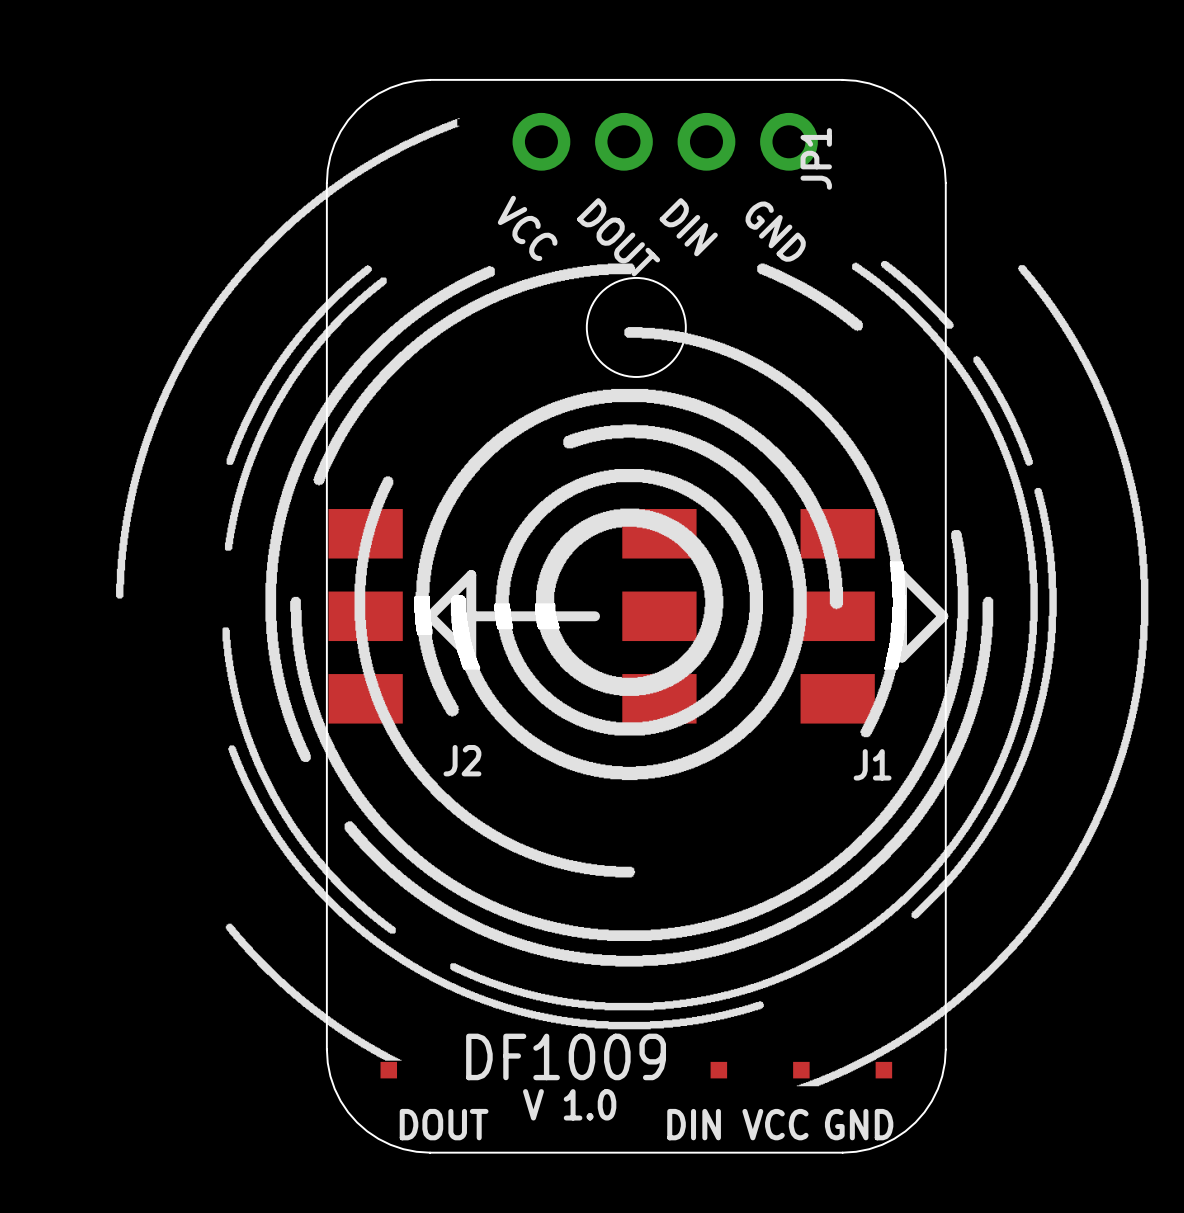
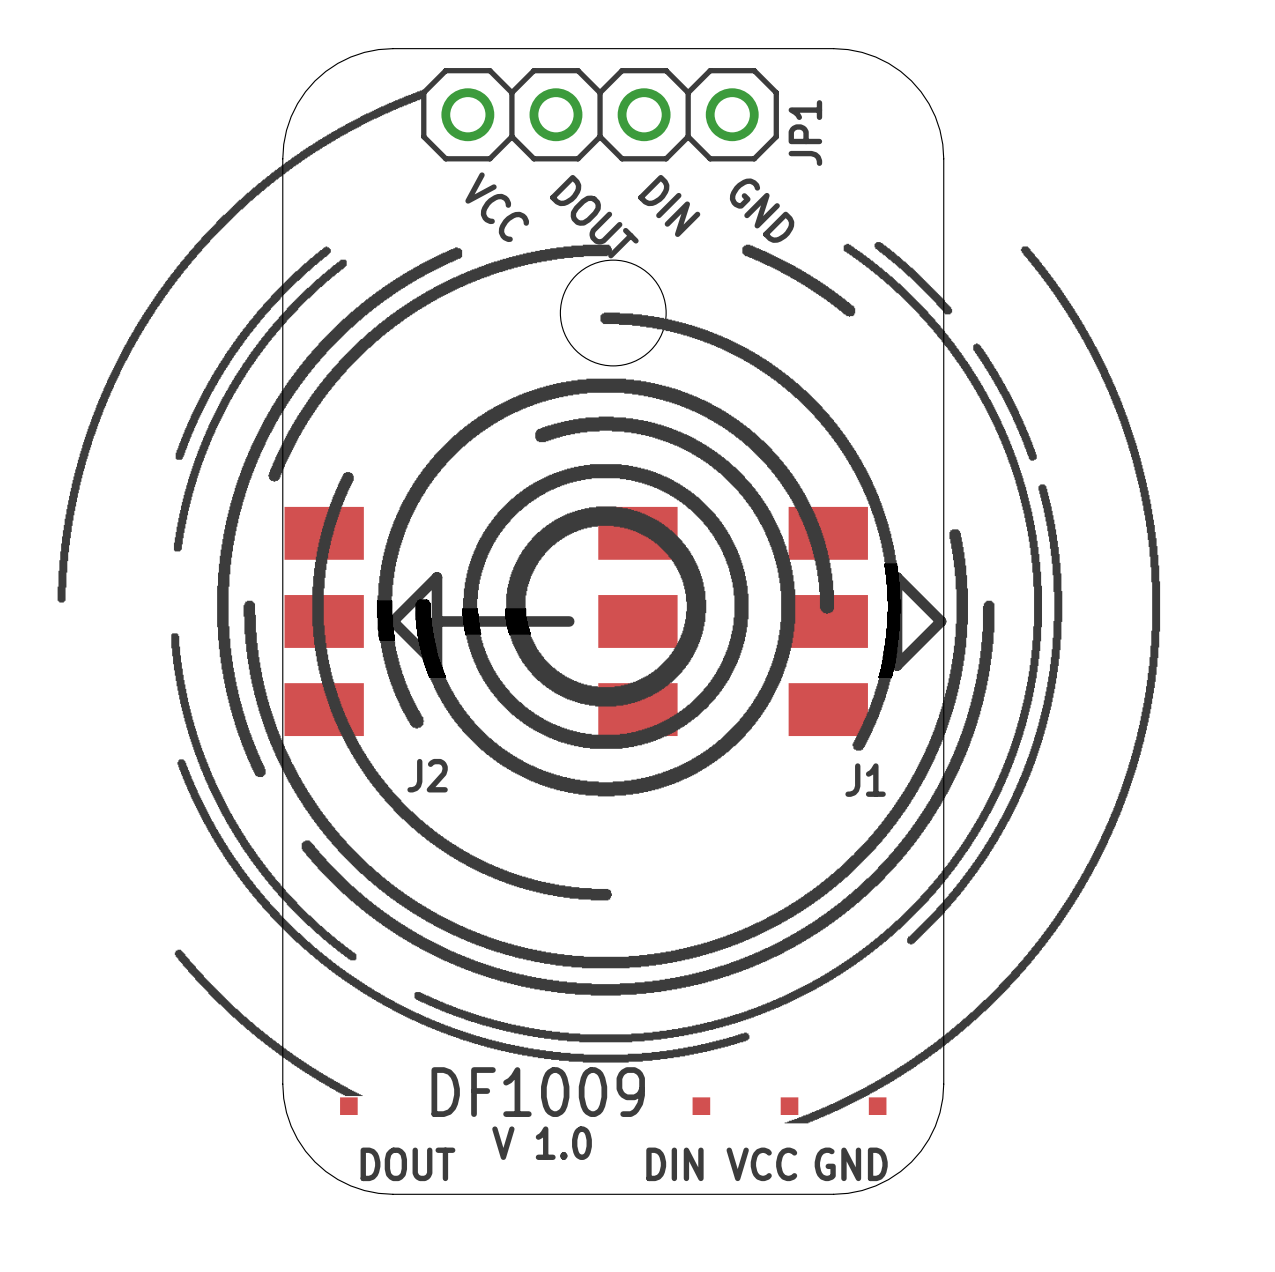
JP1 footprint: [512, 112, 818, 171] -> [421, 68, 779, 162]

